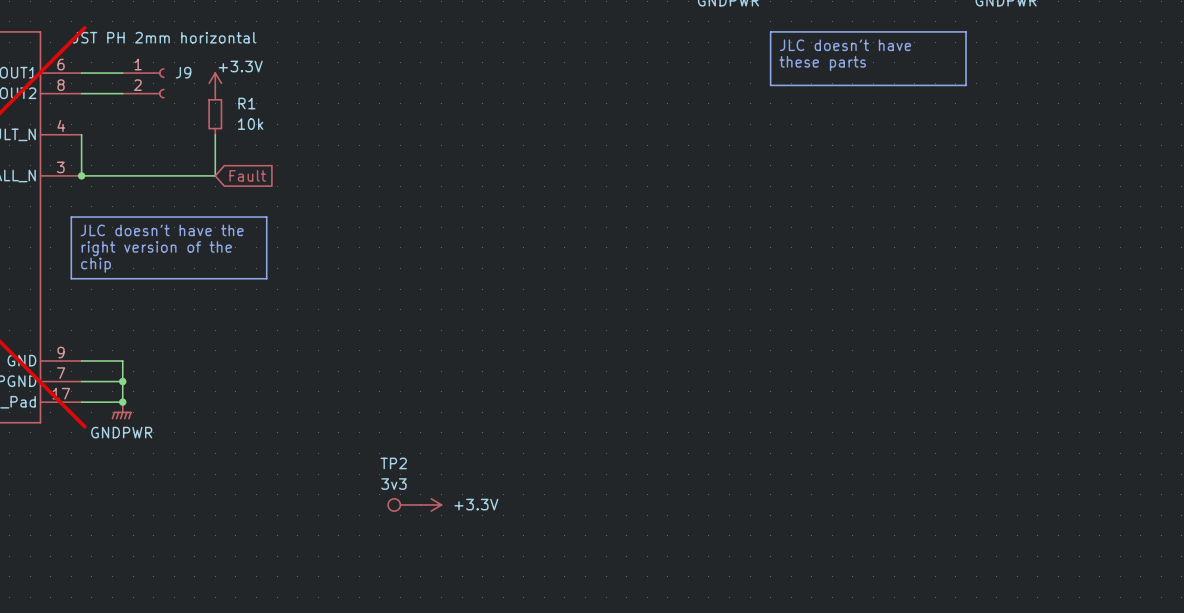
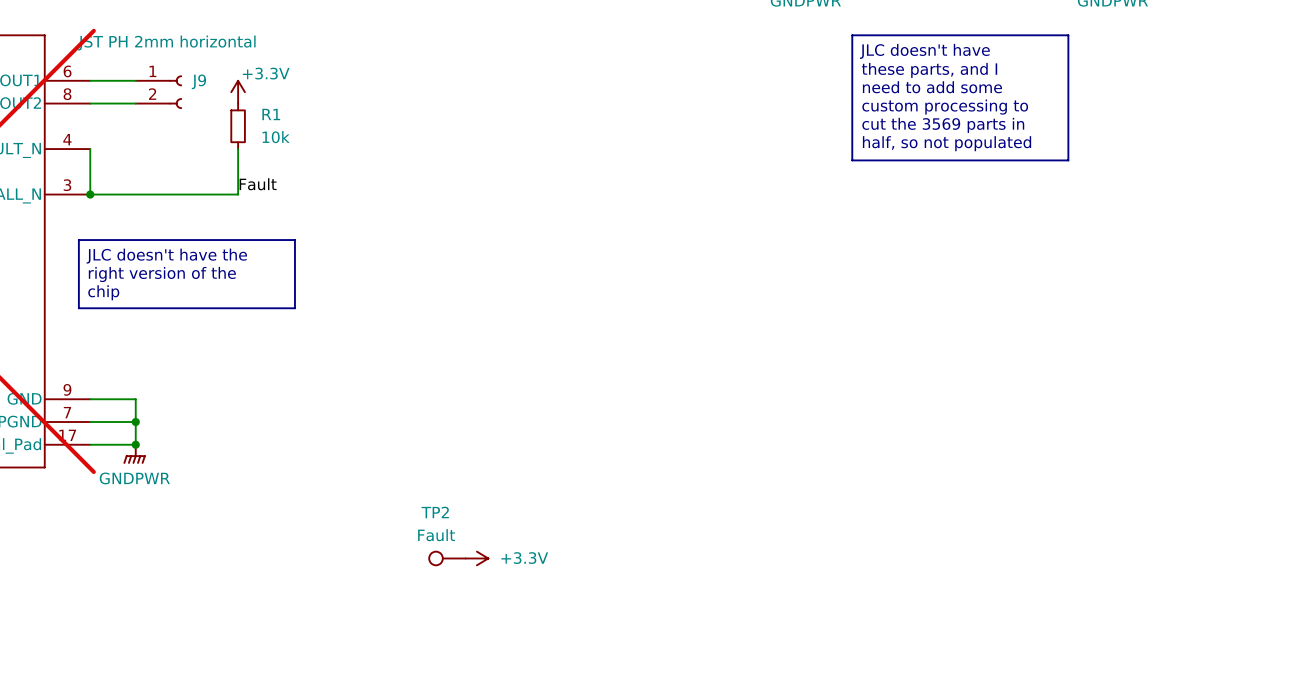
text: these parts (822, 63) -> these parts, and I (929, 70)
text: none -> need to add some (932, 87)
line: (770, 85) (966, 85) -> (852, 94) (852, 160) (1068, 160) (1068, 94)
text: none -> custom processing to (945, 107)
text: none -> cut the 3569 parts in (943, 125)
text: none -> half, so not populated (947, 143)
label: none -> Fault (258, 184)
global label: Fault (247, 175) -> none
TP2 value: 3v3 (393, 484) -> Fault (436, 535)

